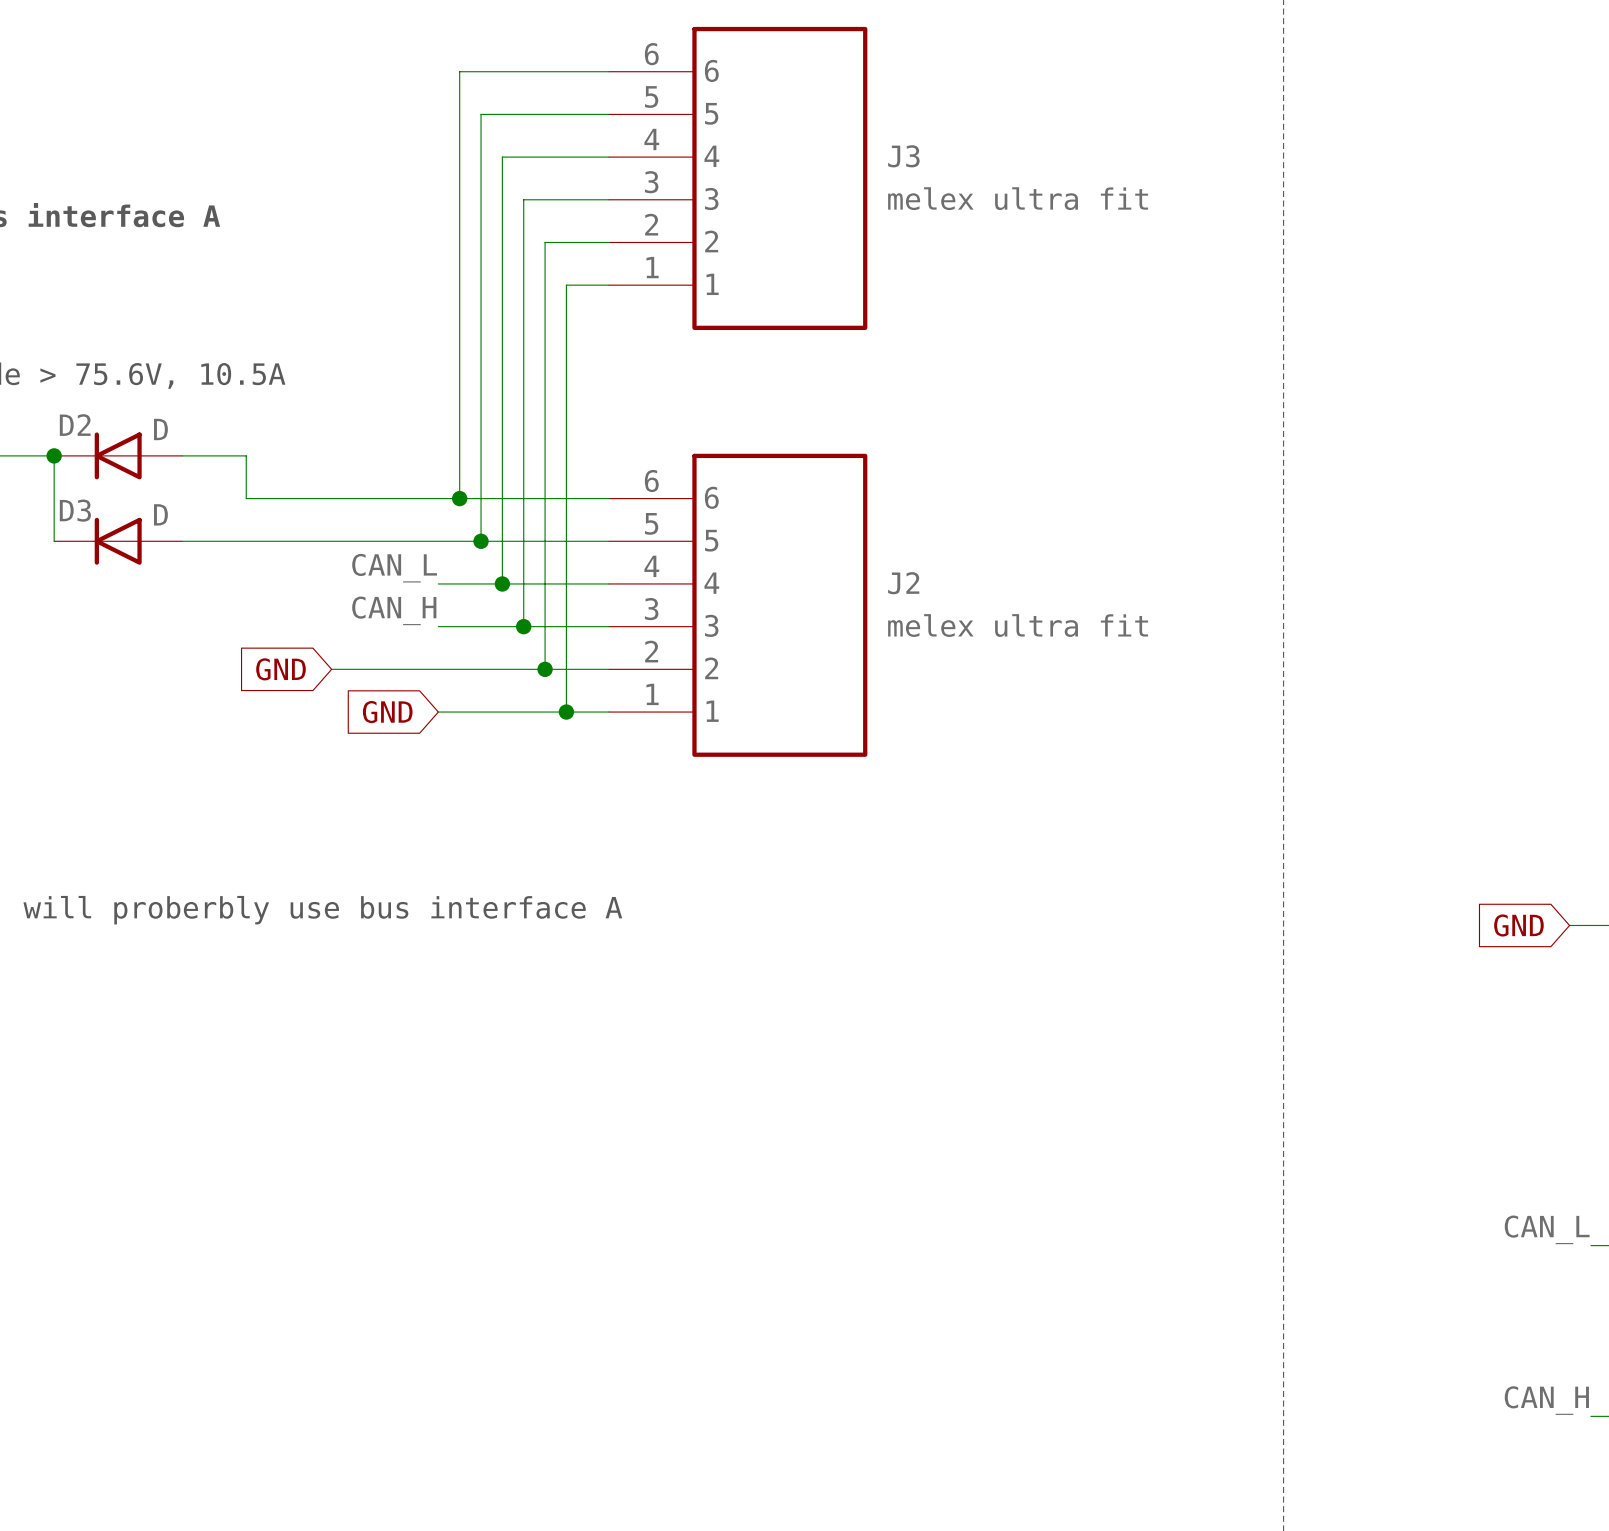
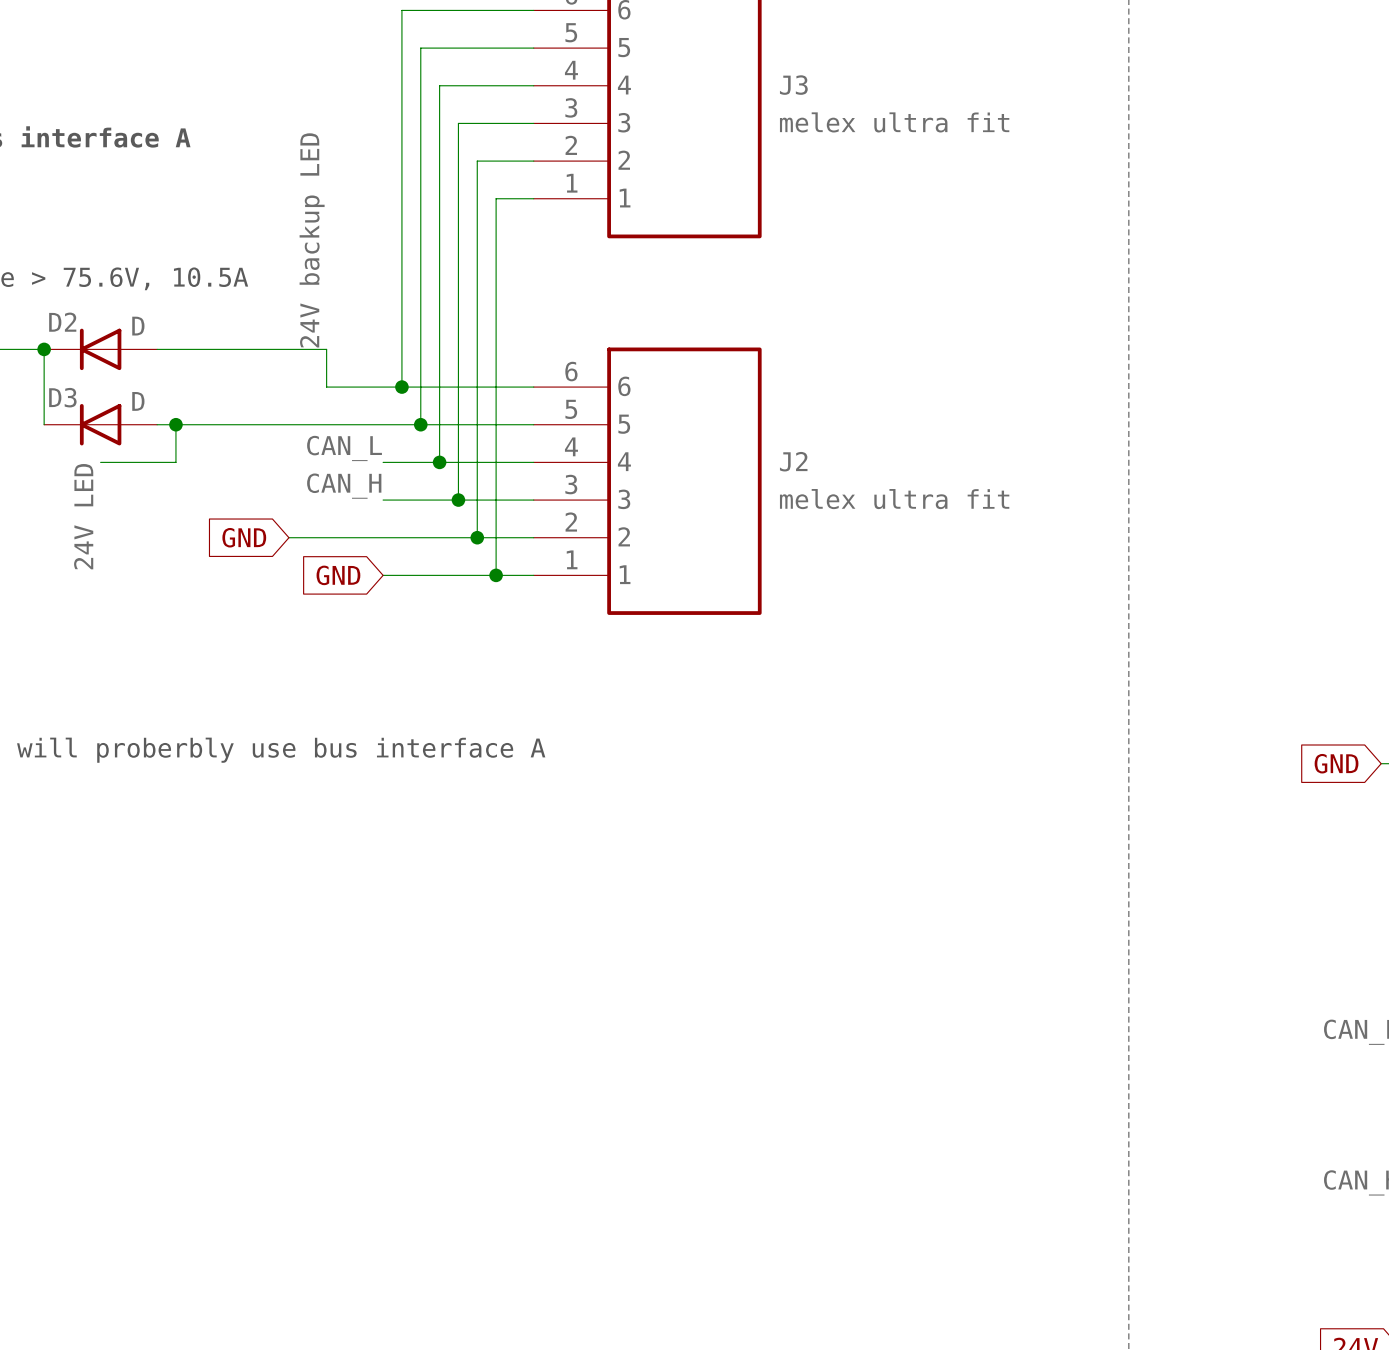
label: none -> 24V backup LED (312, 240)
wire: (246, 455) (246, 498) (374, 498) -> (213, 349) (326, 349) (326, 387)
wire: none -> (175, 424) (175, 462) (100, 462)
junction: none -> (175, 424)
label: none -> 24V LED (83, 516)

